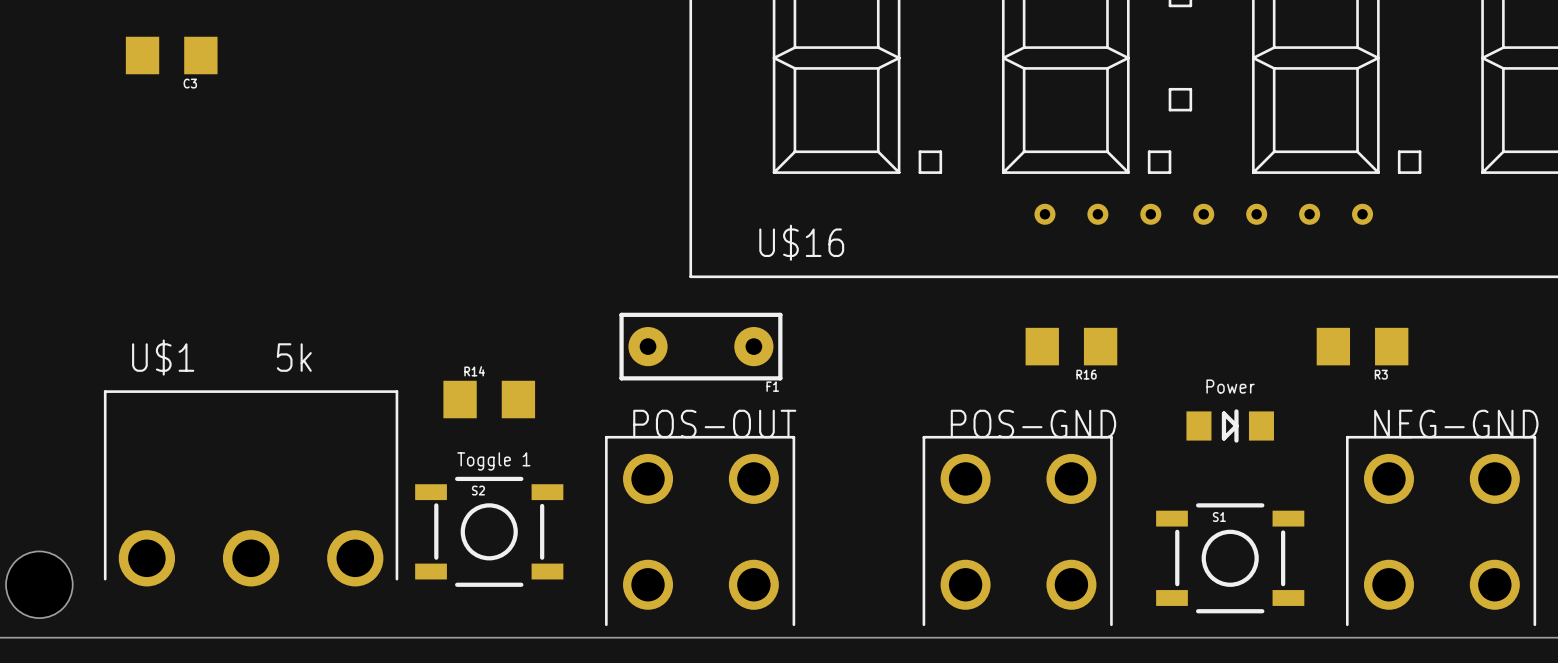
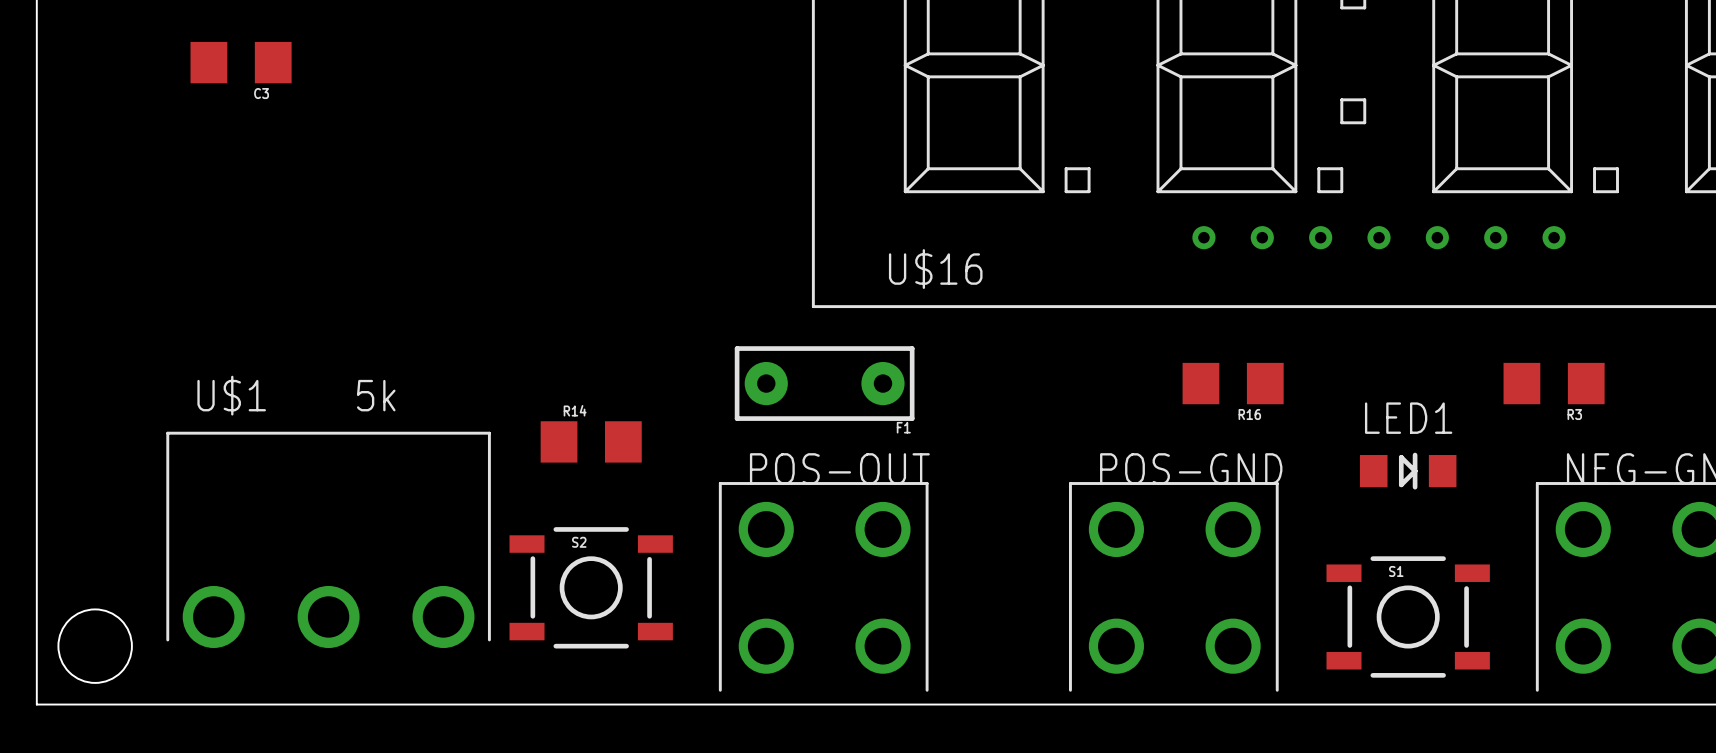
LED1 name: none -> LED1 (1408, 418)
text: Power (1230, 386) -> none
text: Toggle 1 (493, 461) -> none

